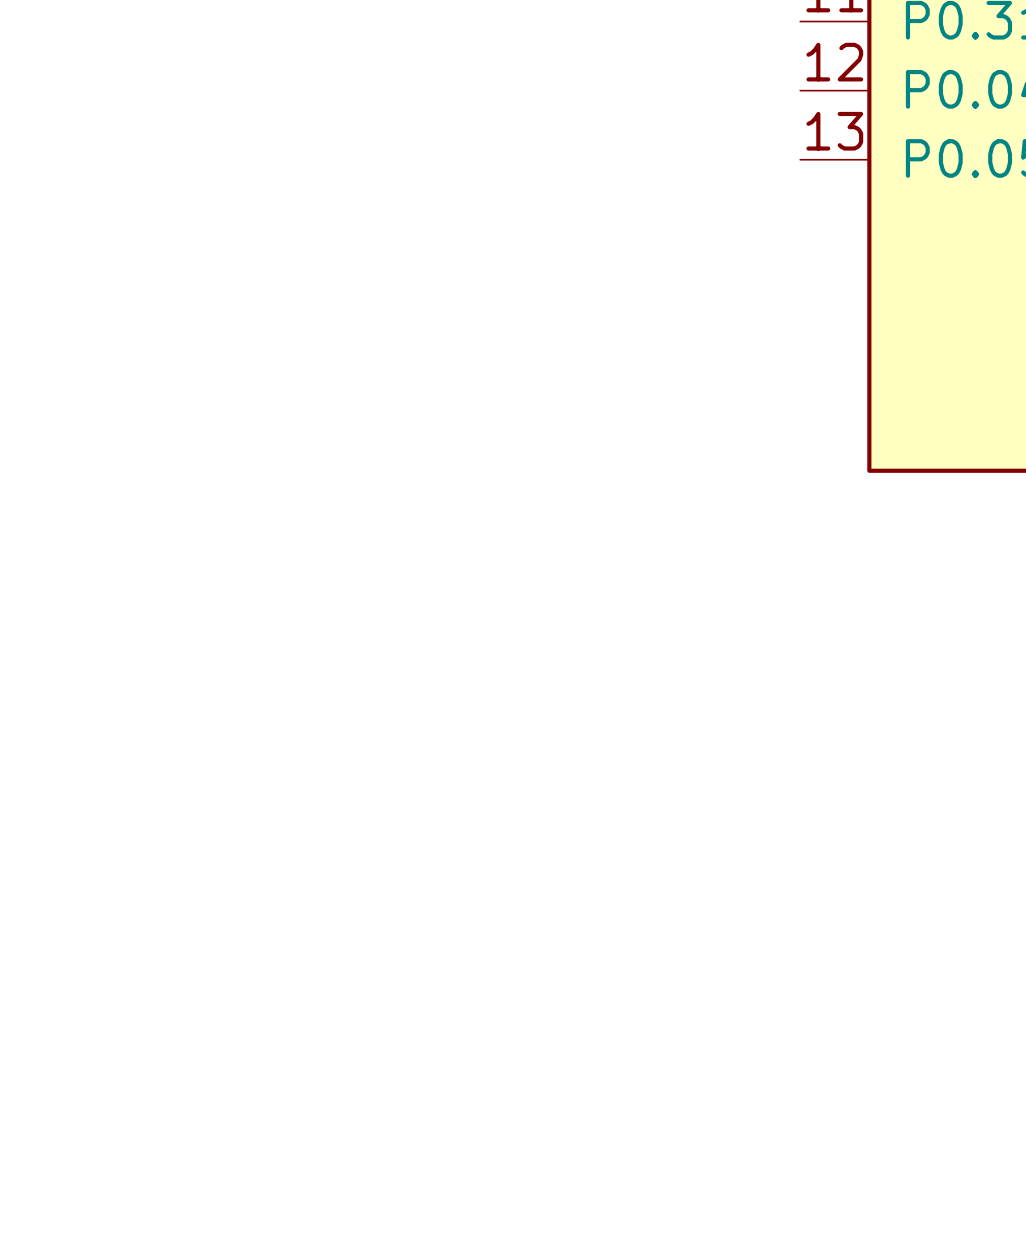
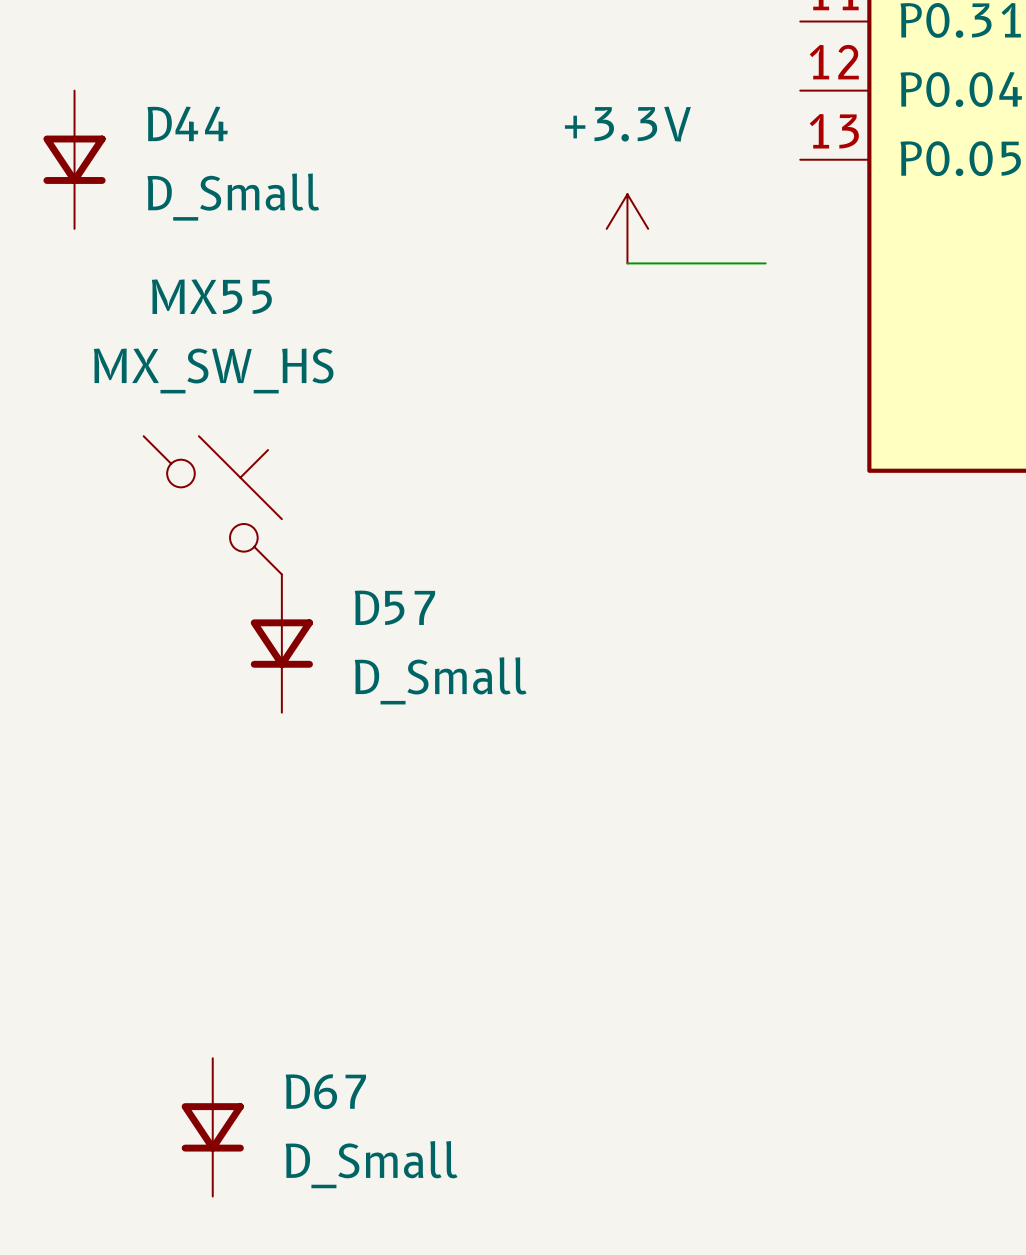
D44: none -> D_Small (74, 159)
power symbol: none -> +3.3V (627, 228)
wire: none -> (627, 263) (765, 263)
MX55: none -> MX_SW_HS (212, 505)
D57: none -> D_Small (281, 643)
D67: none -> D_Small (212, 1127)

